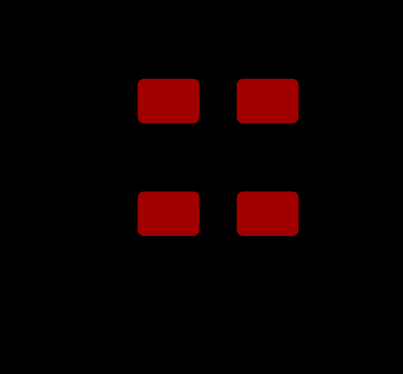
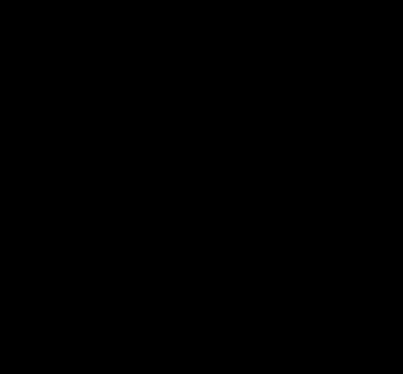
part: (218, 101) -> none
part: (218, 213) -> none

